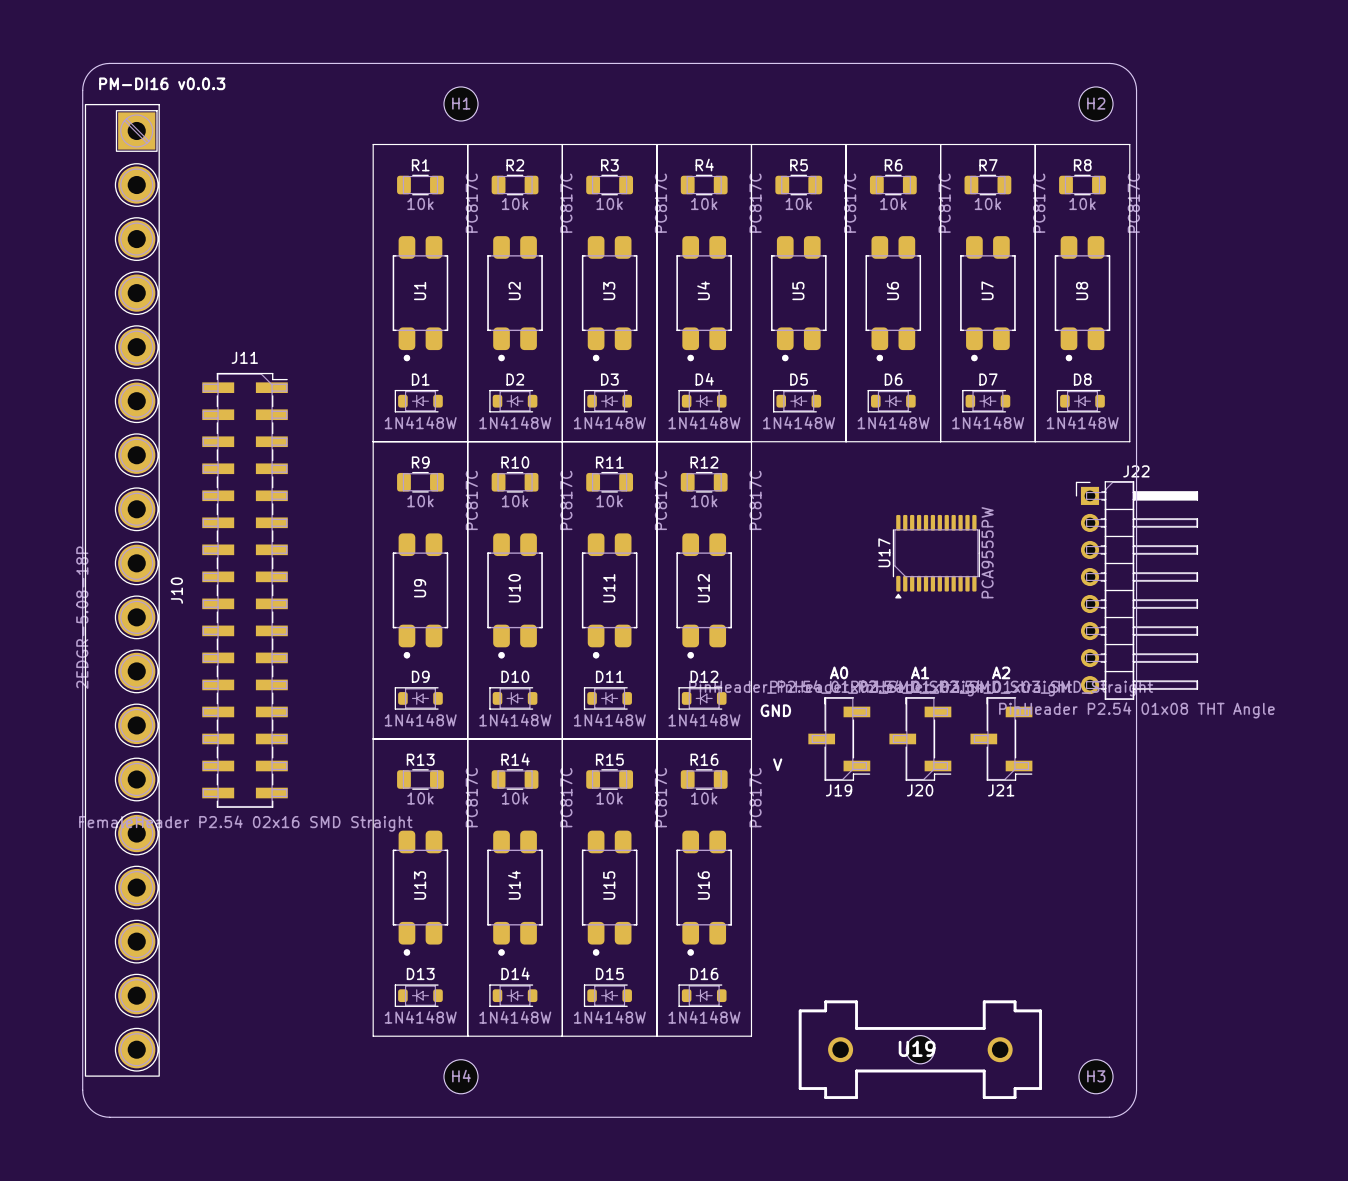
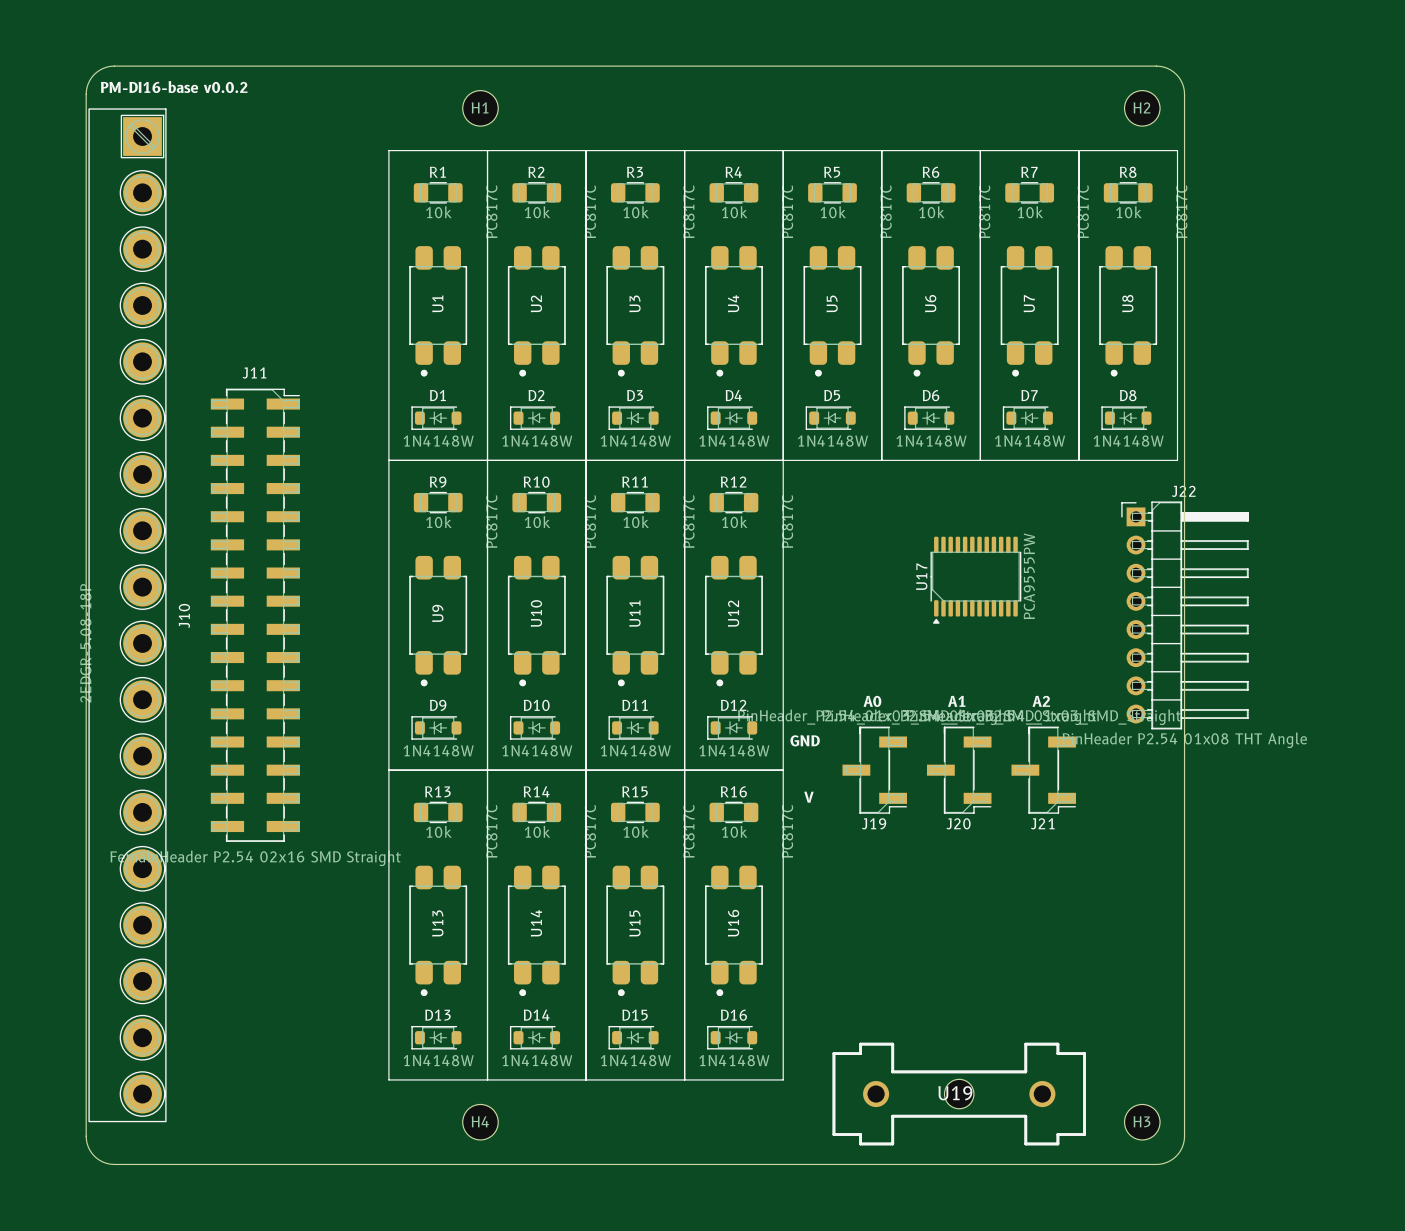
text: PM-DI16 v0.0.3 (162, 83) -> PM-DI16-base v0.0.2 (174, 87)

